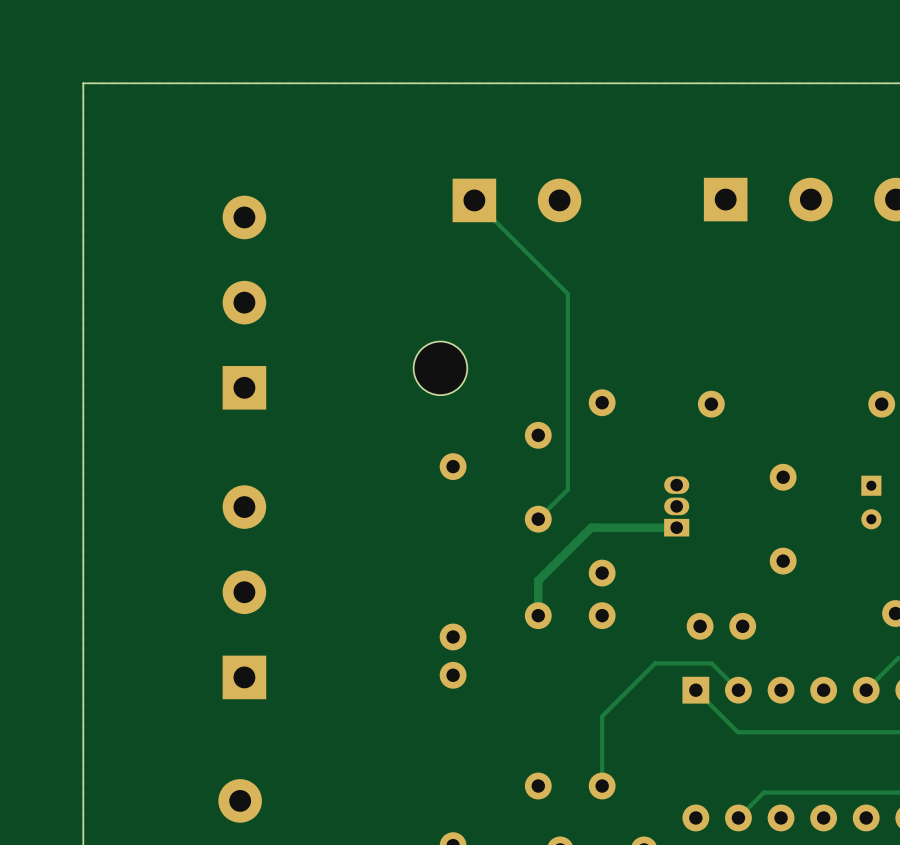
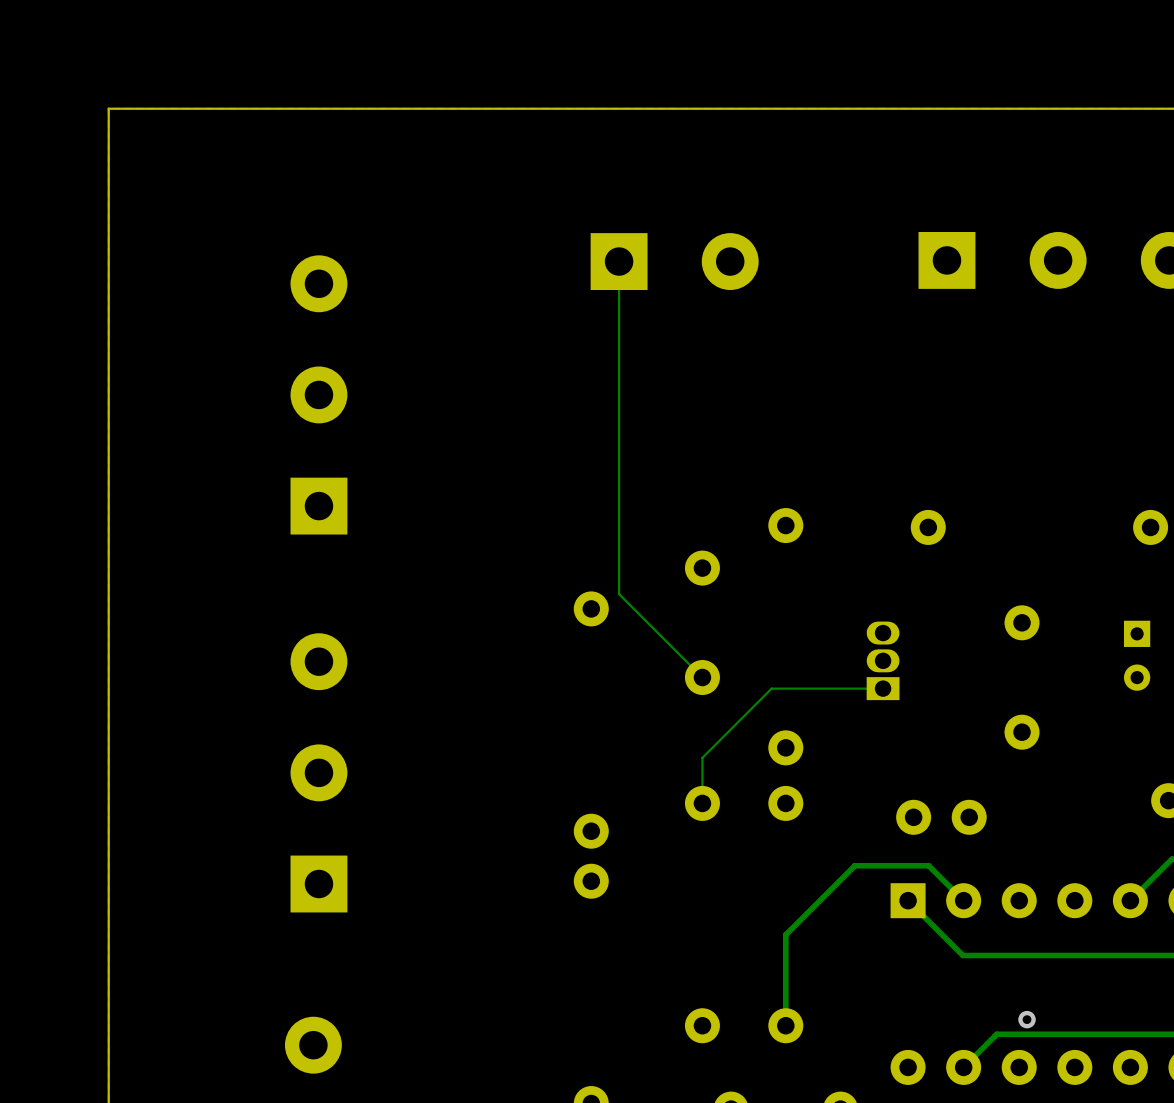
track: (474, 200) (567, 293) (567, 489) (538, 519) -> (619, 261) (619, 594) (702, 677)
part: (440, 368) -> none
track width: thick (676, 527) (591, 527) (538, 580) (538, 615) -> thin (883, 688) (771, 688) (702, 757) (702, 803)
via: none -> (1027, 1019)

